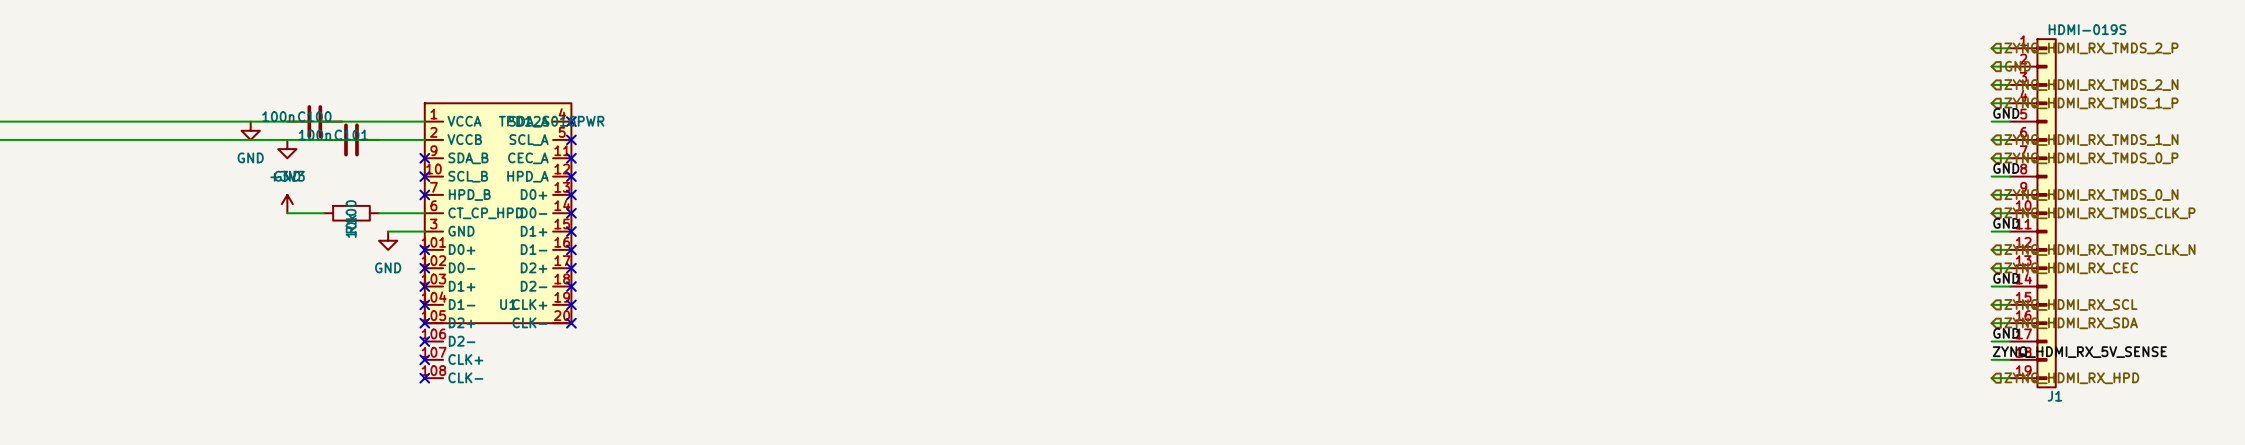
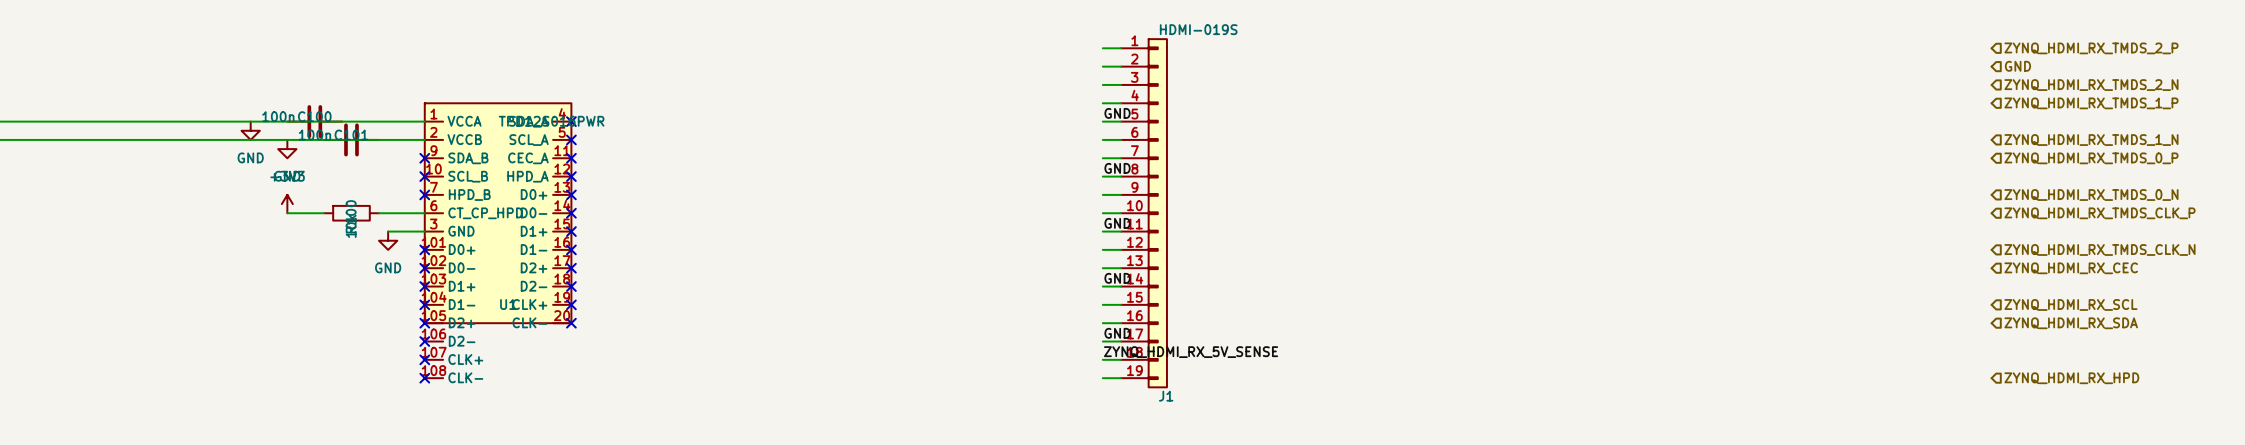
wire: none -> (1102, 48) (1121, 48)
wire: (1991, 48) (2009, 48) -> none
wire: none -> (1102, 66) (1121, 66)
wire: (1991, 66) (2009, 66) -> none
wire: none -> (1102, 84) (1121, 84)
wire: (1991, 84) (2009, 84) -> none
wire: none -> (1102, 103) (1121, 103)
wire: (1991, 103) (2009, 103) -> none
label: none -> GND (1117, 113)
label: GND (2006, 113) -> none
wire: none -> (1102, 121) (1121, 121)
wire: (1991, 121) (2009, 121) -> none
wire: none -> (1102, 139) (1121, 139)
wire: (1991, 139) (2009, 139) -> none
wire: none -> (1102, 158) (1121, 158)
wire: (1991, 158) (2009, 158) -> none
label: none -> GND (1117, 168)
label: GND (2006, 168) -> none
wire: none -> (1102, 176) (1121, 176)
wire: (1991, 176) (2009, 176) -> none
wire: none -> (1102, 194) (1121, 194)
wire: (1991, 194) (2009, 194) -> none
wire: none -> (1102, 213) (1121, 213)
wire: (1991, 213) (2009, 213) -> none
J1 position: (2033, 213) -> (1144, 213)
label: none -> GND (1117, 223)
label: GND (2006, 223) -> none
wire: none -> (1102, 231) (1121, 231)
wire: (1991, 231) (2009, 231) -> none
wire: none -> (1102, 249) (1121, 249)
wire: (1991, 249) (2009, 249) -> none
wire: none -> (1102, 268) (1121, 268)
wire: (1991, 268) (2009, 268) -> none
label: none -> GND (1117, 278)
label: GND (2006, 278) -> none
wire: none -> (1102, 286) (1121, 286)
wire: (1991, 286) (2009, 286) -> none
wire: none -> (1102, 304) (1121, 304)
wire: (1991, 304) (2009, 304) -> none
wire: none -> (1102, 323) (1121, 323)
wire: (1991, 323) (2009, 323) -> none
label: none -> GND (1117, 333)
label: GND (2006, 333) -> none
wire: none -> (1102, 341) (1121, 341)
wire: (1991, 341) (2009, 341) -> none
label: none -> ZYNQ_HDMI_RX_5V_SENSE (1191, 352)
label: ZYNQ_HDMI_RX_5V_SENSE (2079, 352) -> none
wire: none -> (1102, 359) (1121, 359)
wire: (1991, 359) (2009, 359) -> none
wire: none -> (1102, 378) (1121, 378)
wire: (1991, 378) (2009, 378) -> none

